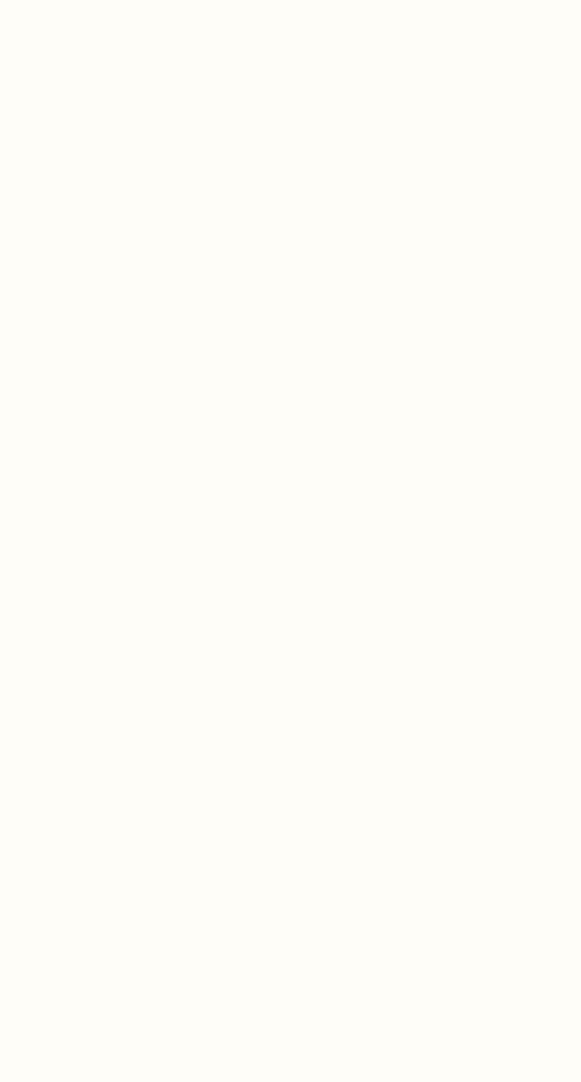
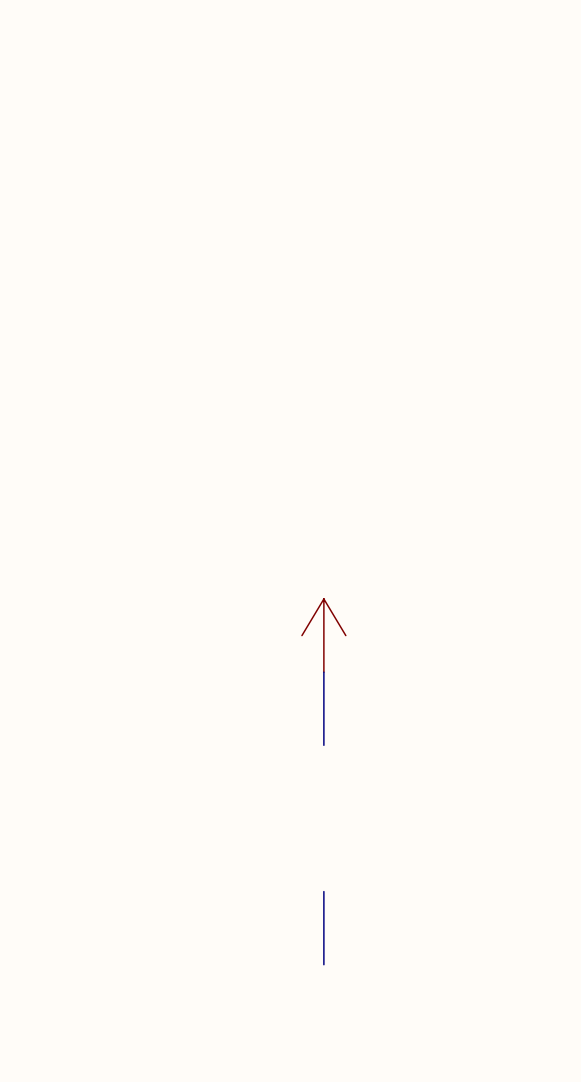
power symbol: none -> (323, 635)
wire: none -> (323, 672) (323, 745)
wire: none -> (323, 891) (323, 964)

